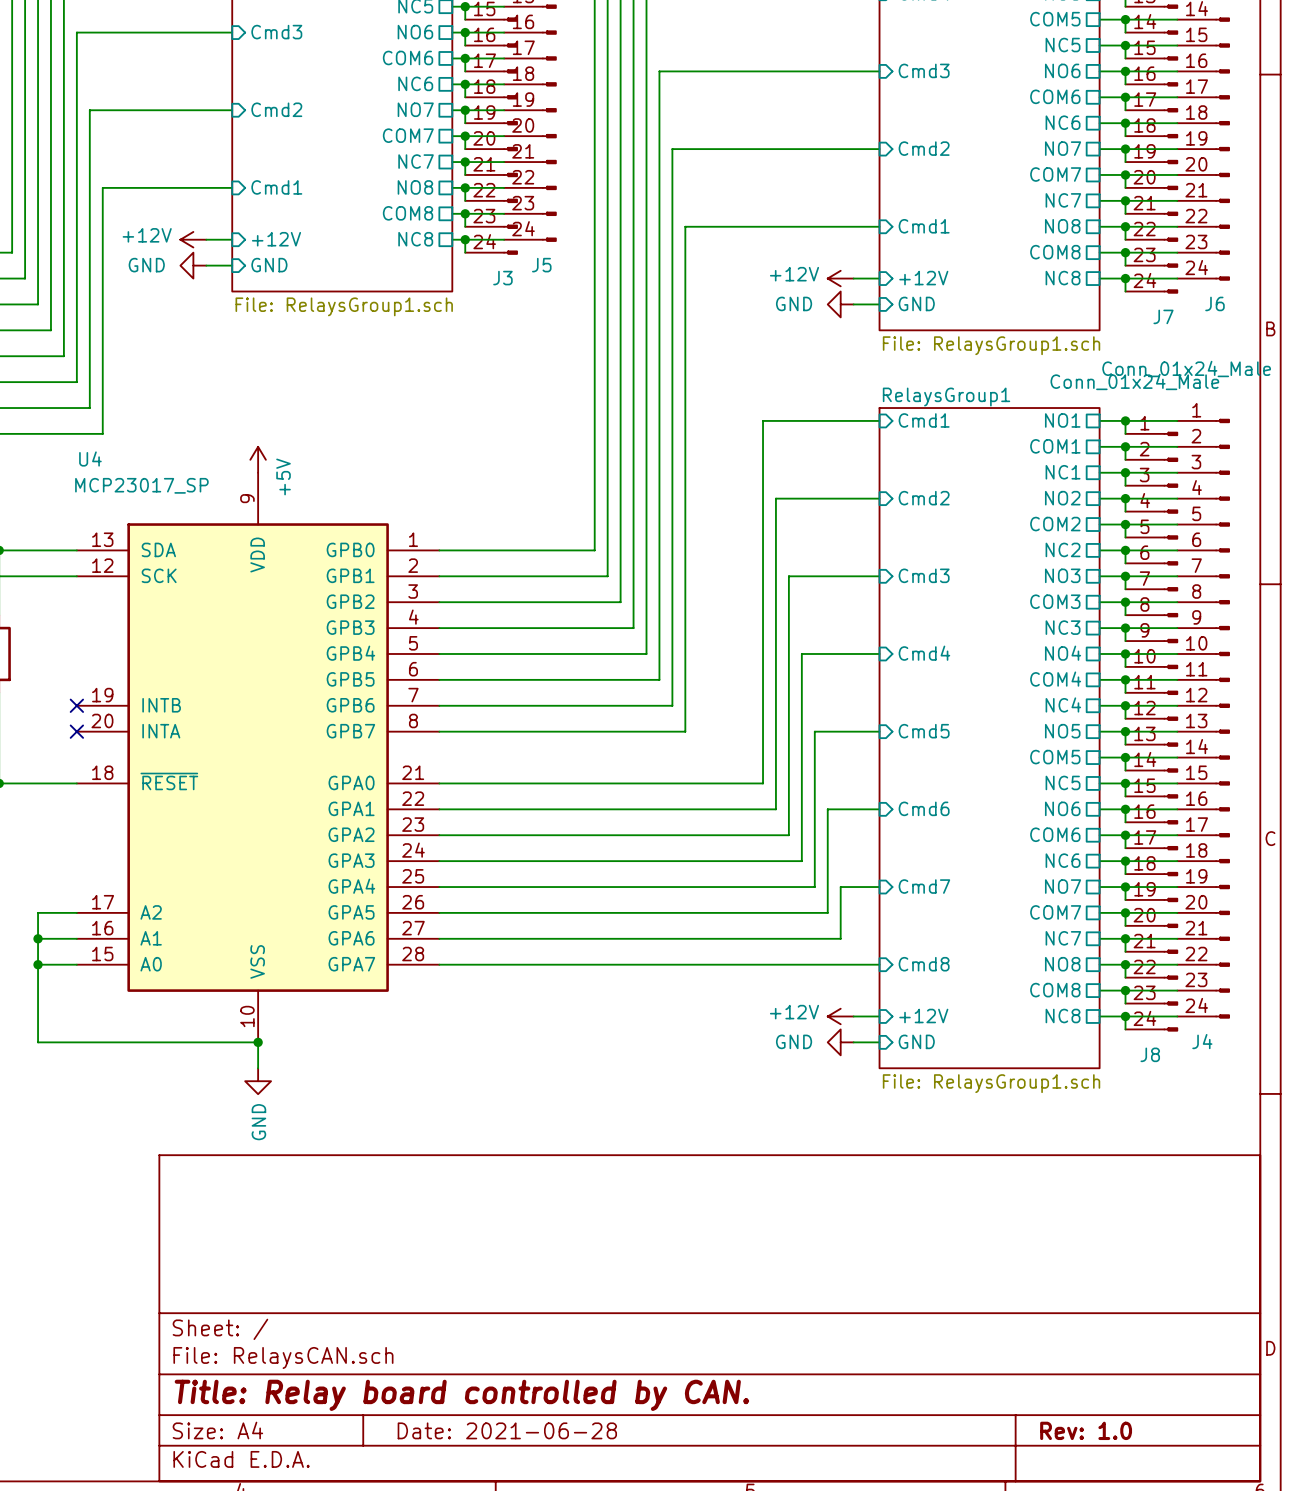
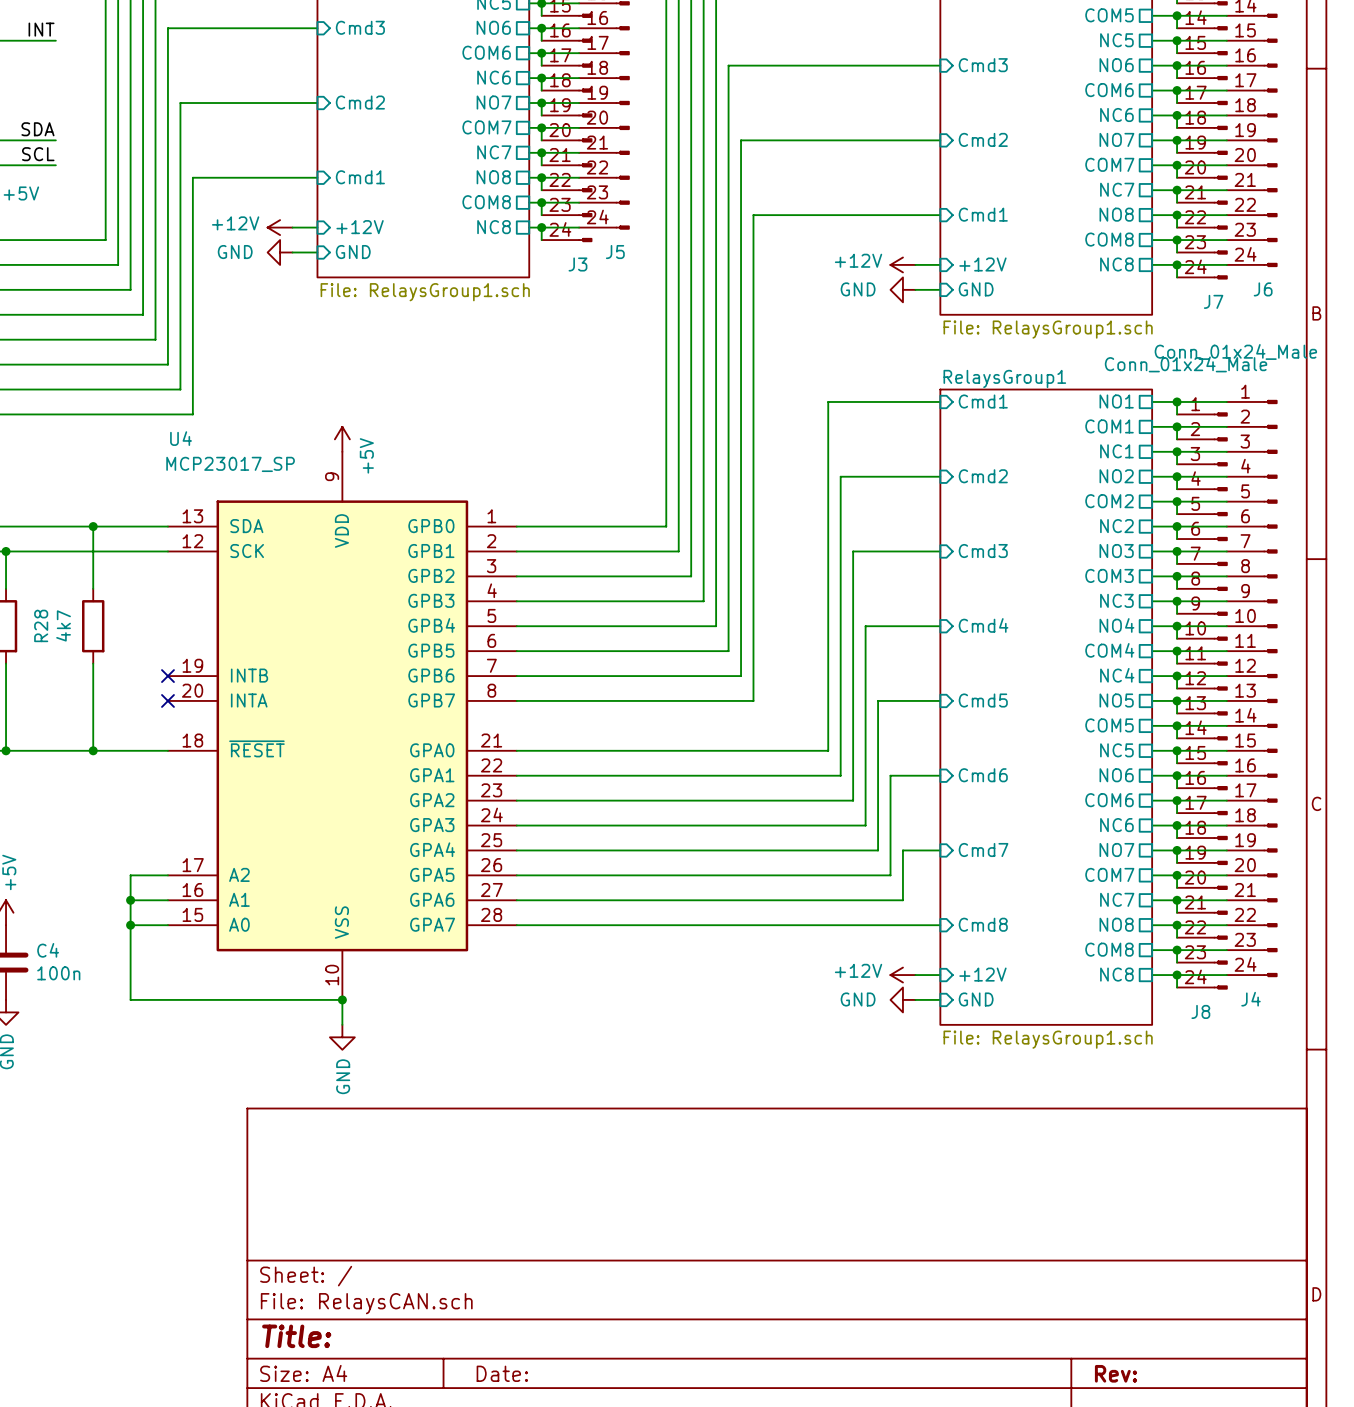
title block: Title: Relay board controlled by CAN. (461, 1395) -> Title: (296, 1336)
title block: Date: 2021-06-28 (507, 1430) -> Date: (502, 1373)
title block: Rev: 1.0 (1086, 1430) -> Rev: (1115, 1373)

